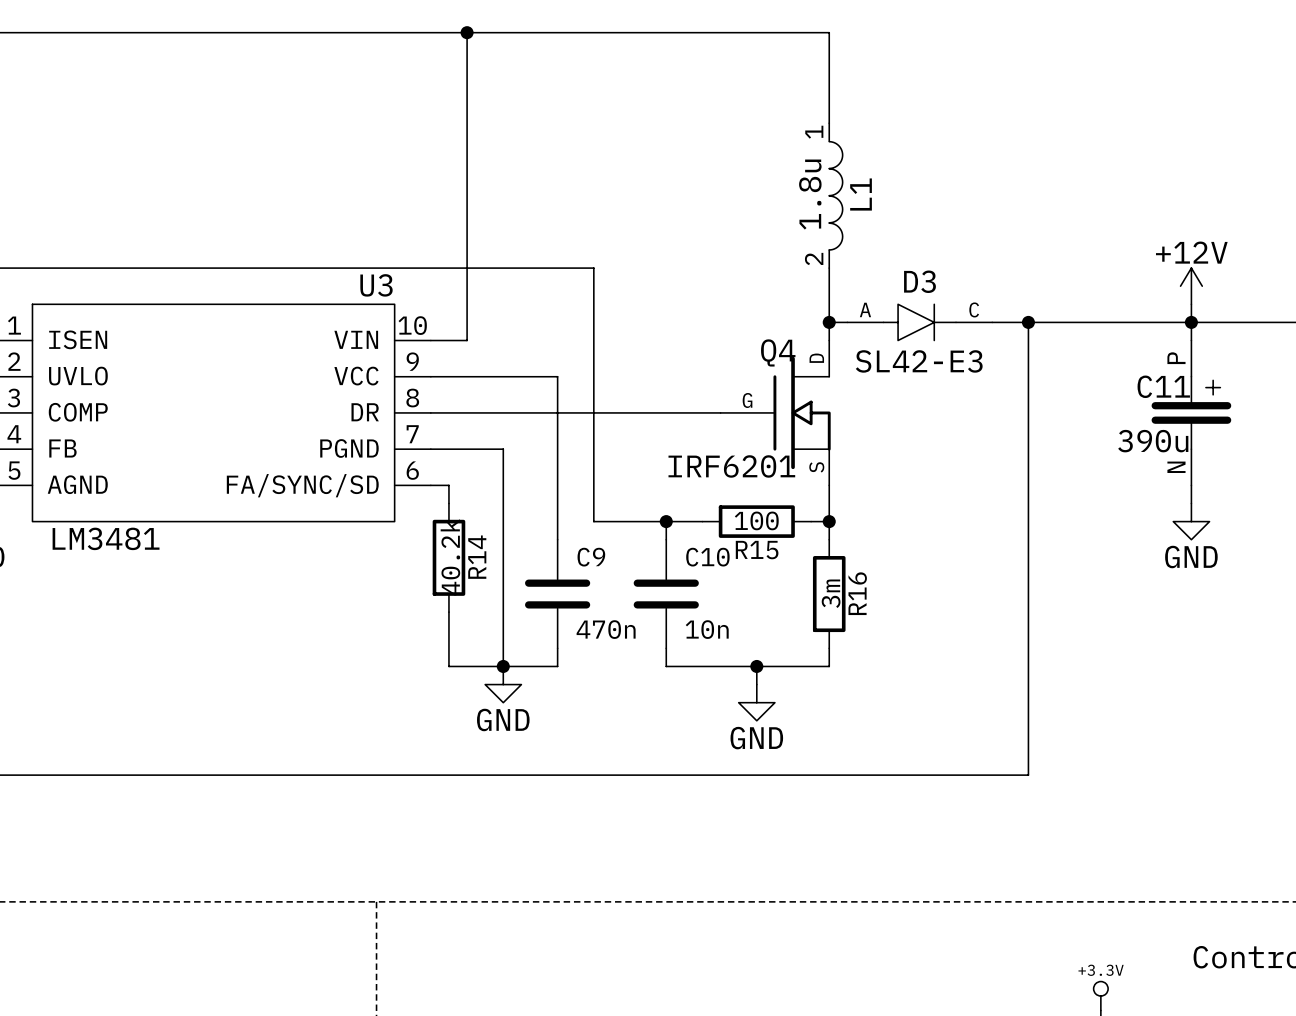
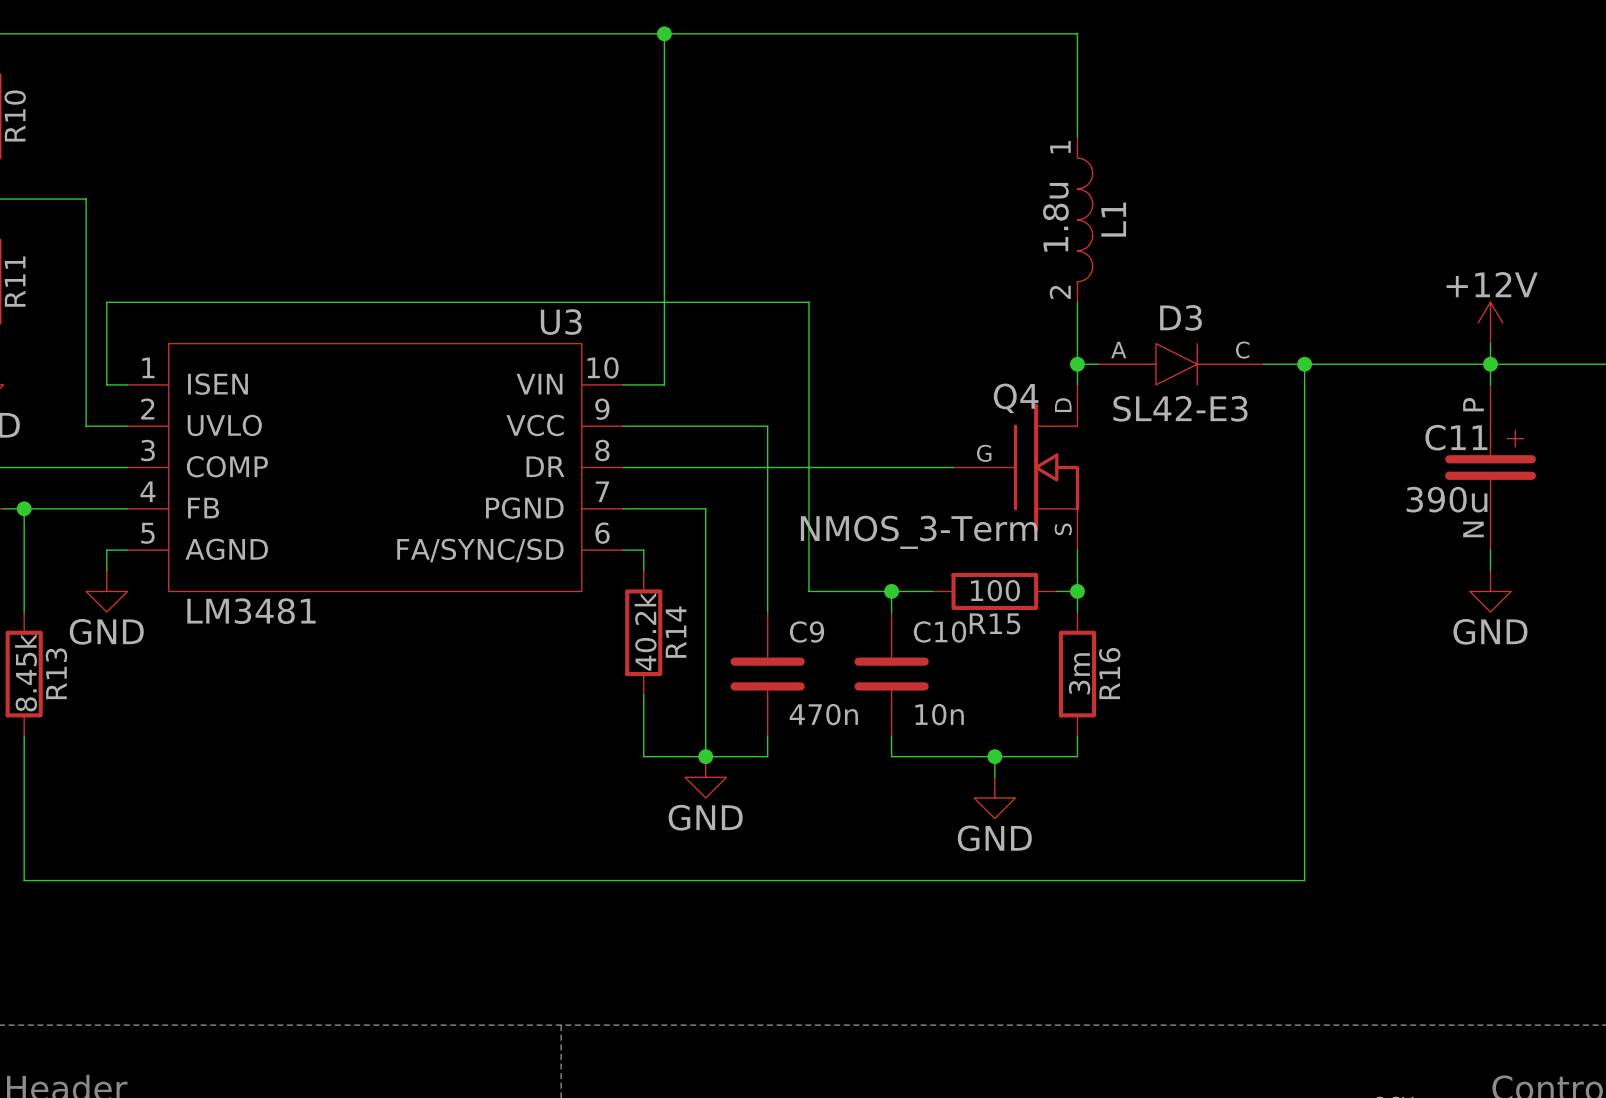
Q4 value: IRF6201 (731, 466) -> NMOS_3-Term (919, 532)

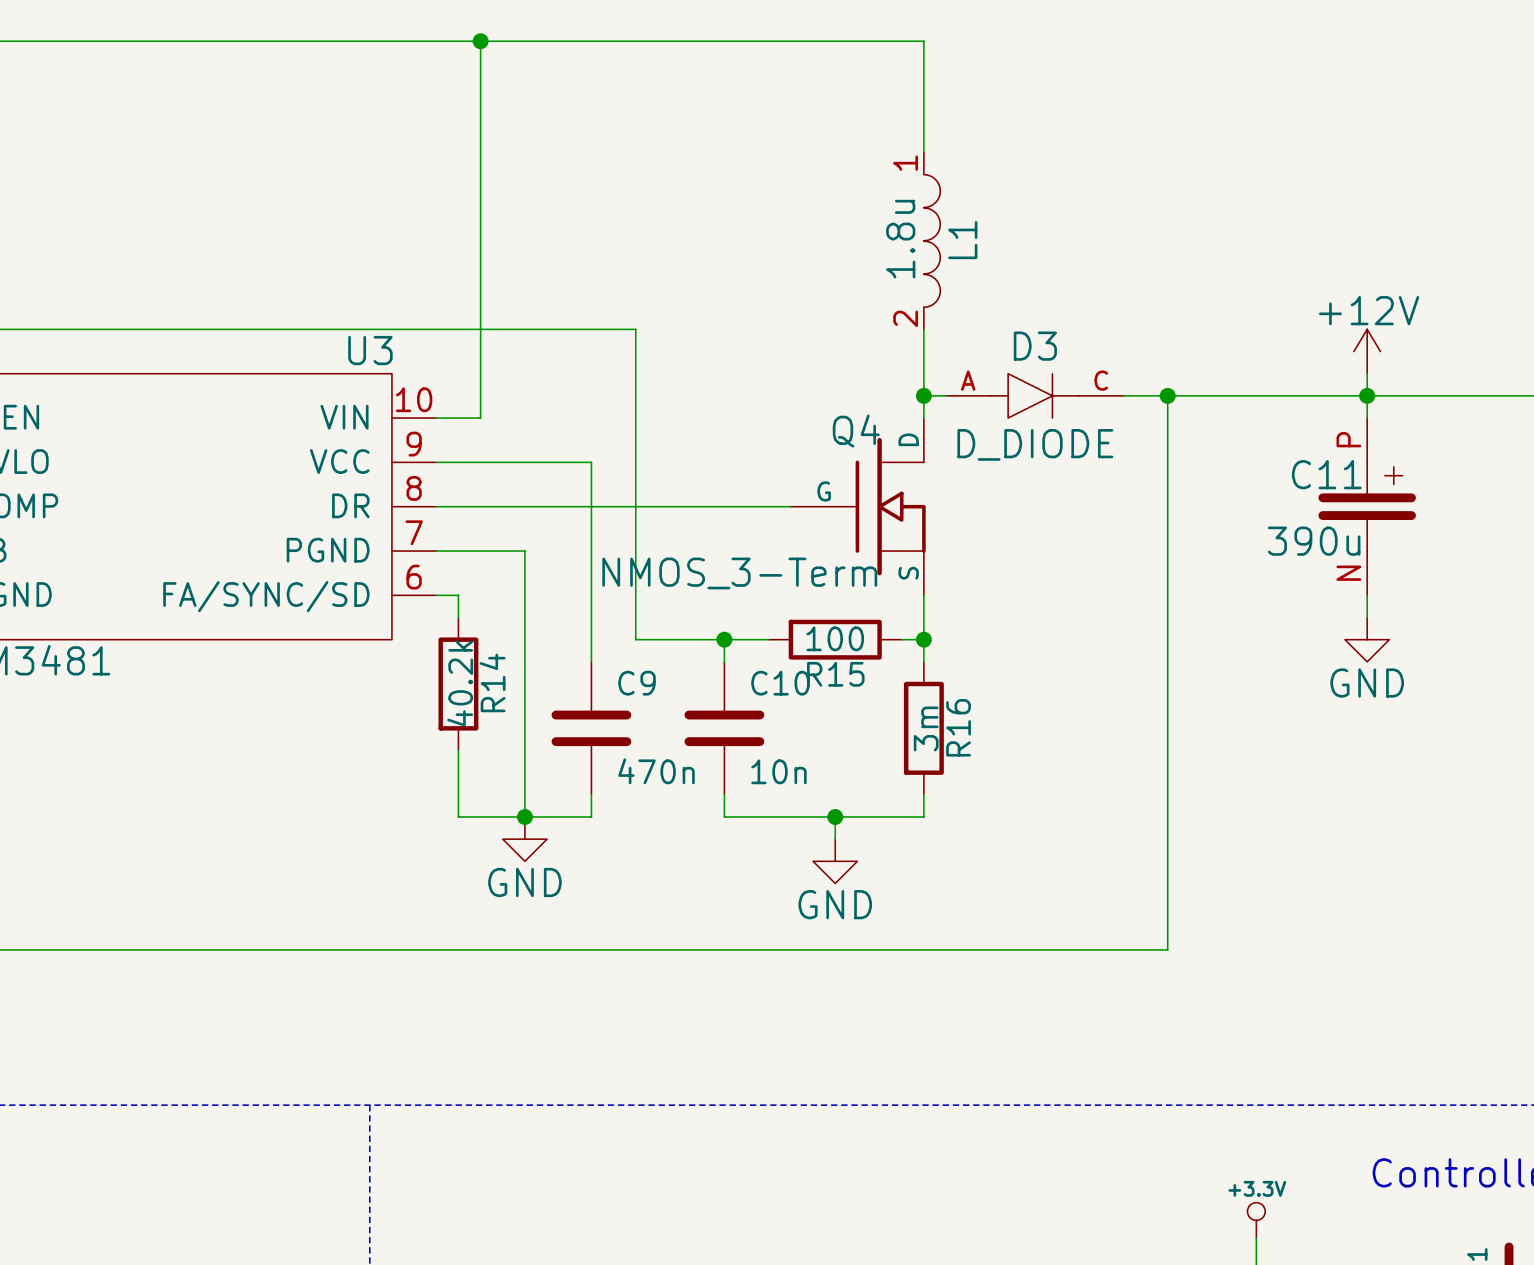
D3 value: SL42-E3 (1180, 408) -> D_DIODE (1035, 444)

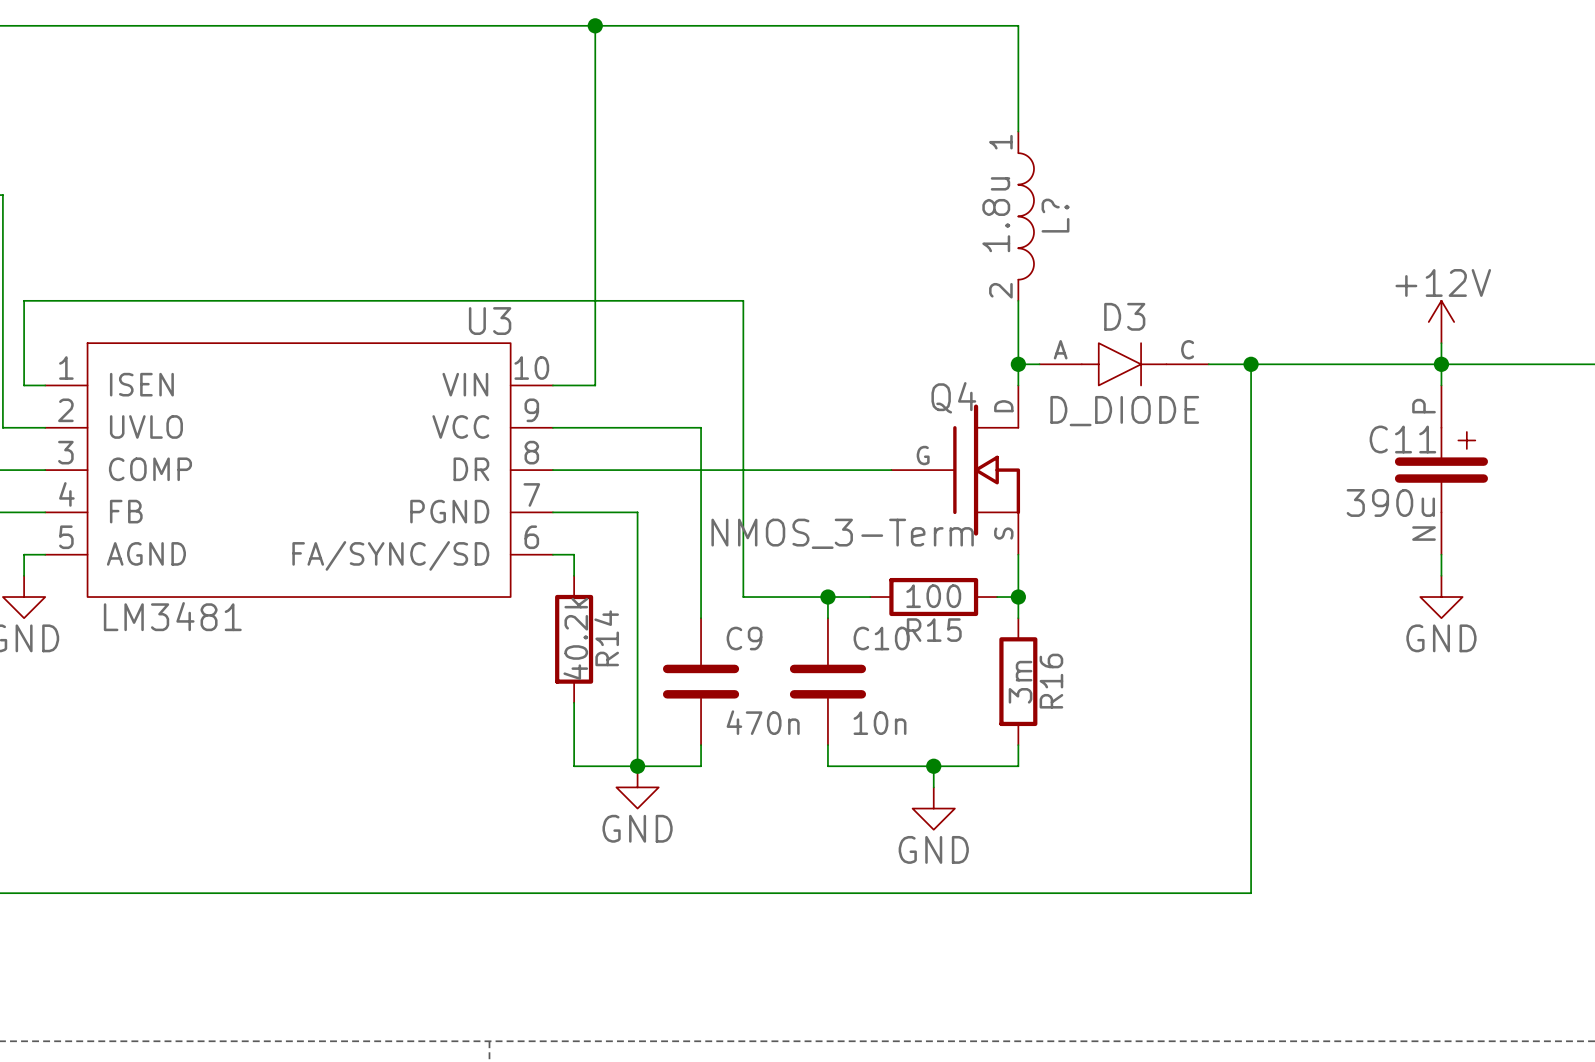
L1 name: L1 (962, 240) -> L? (1055, 215)

